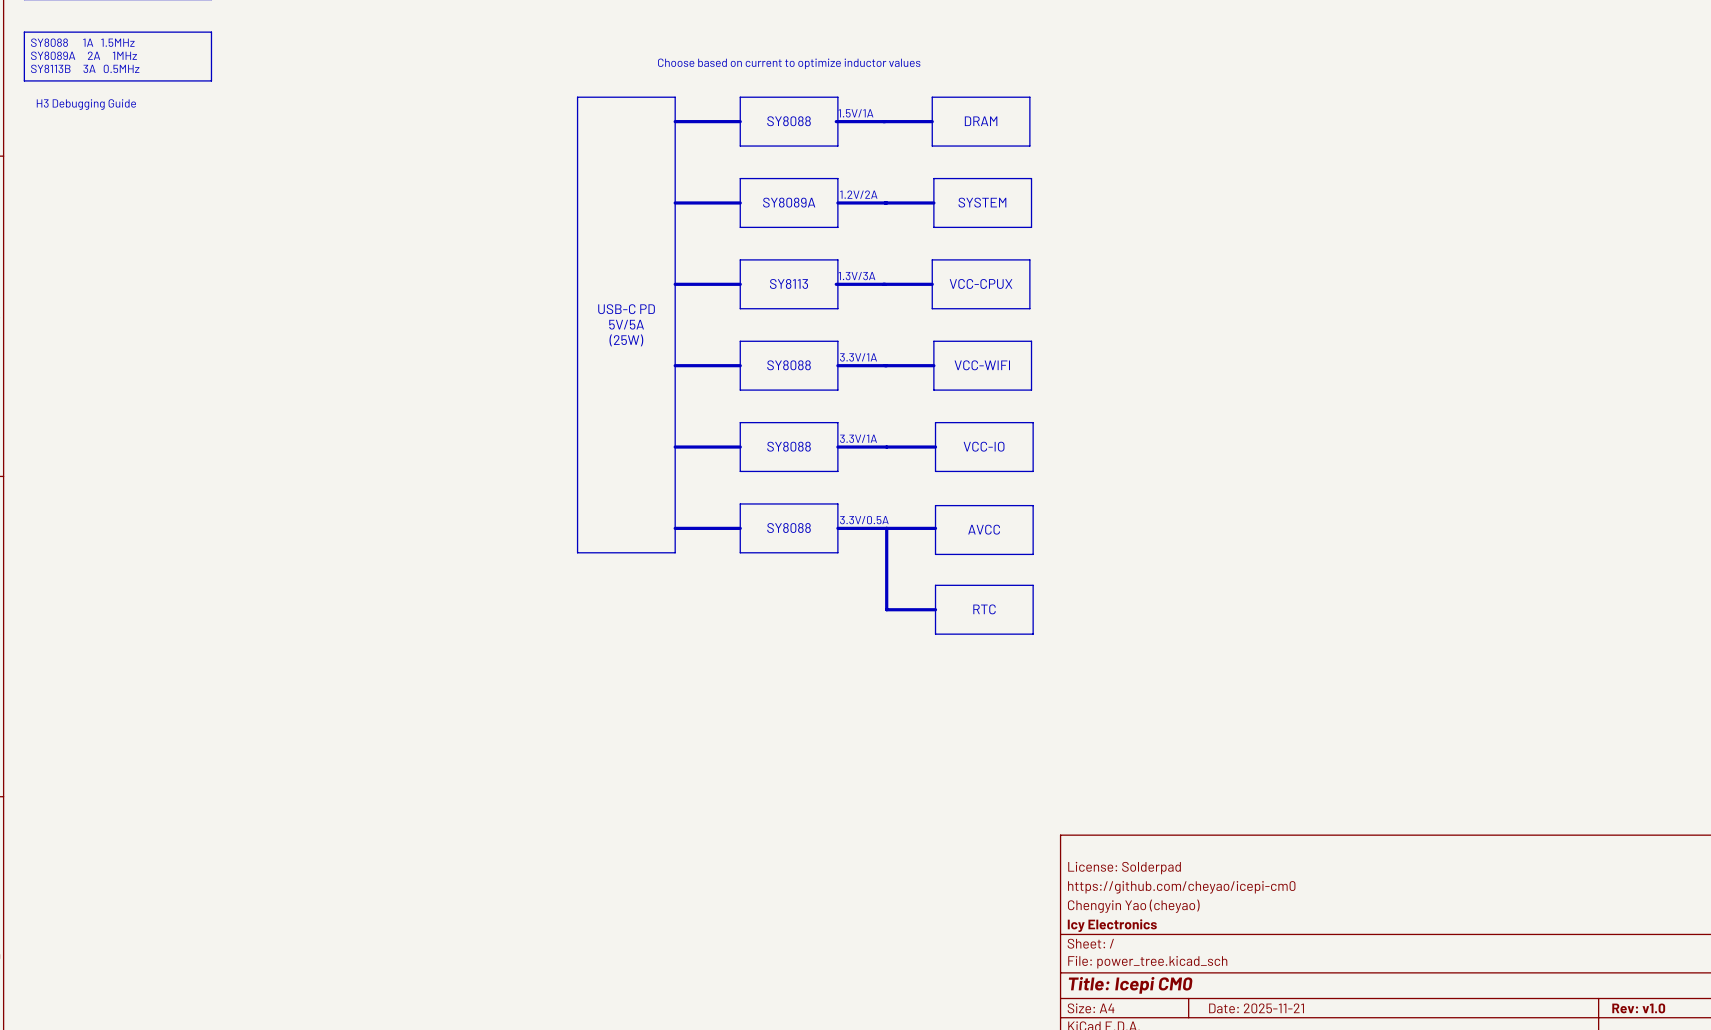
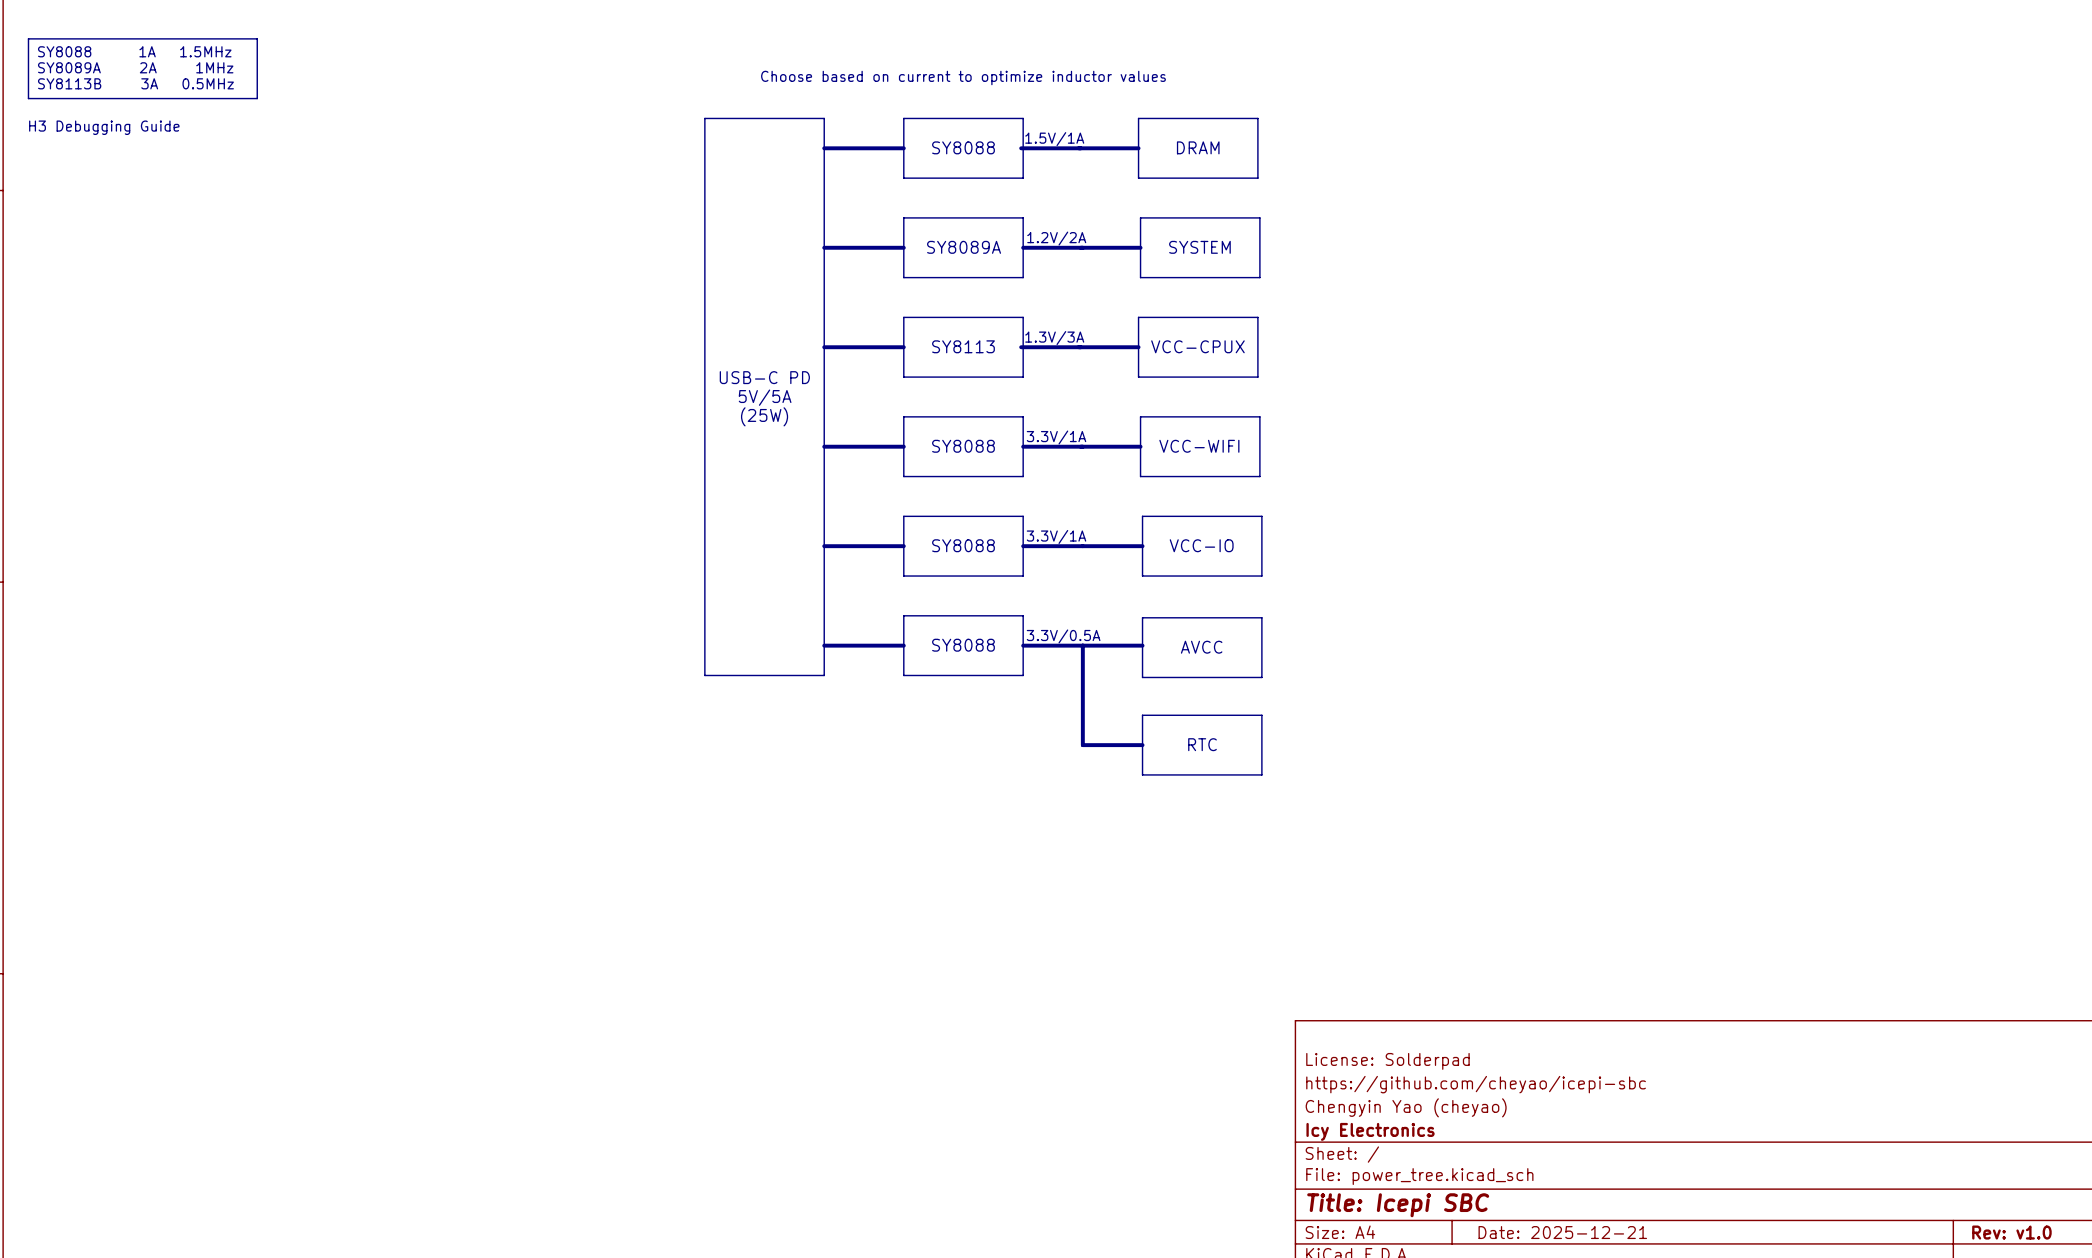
title block: https://github.com/cheyao/icepi-cm0 (1181, 887) -> https://github.com/cheyao/icepi-sbc (1476, 1084)
title block: Title: Icepi CM0 (1130, 985) -> Title: Icepi SBC (1398, 1205)
title block: Date: 2025-11-21 (1256, 1008) -> Date: 2025-12-21 (1562, 1232)

